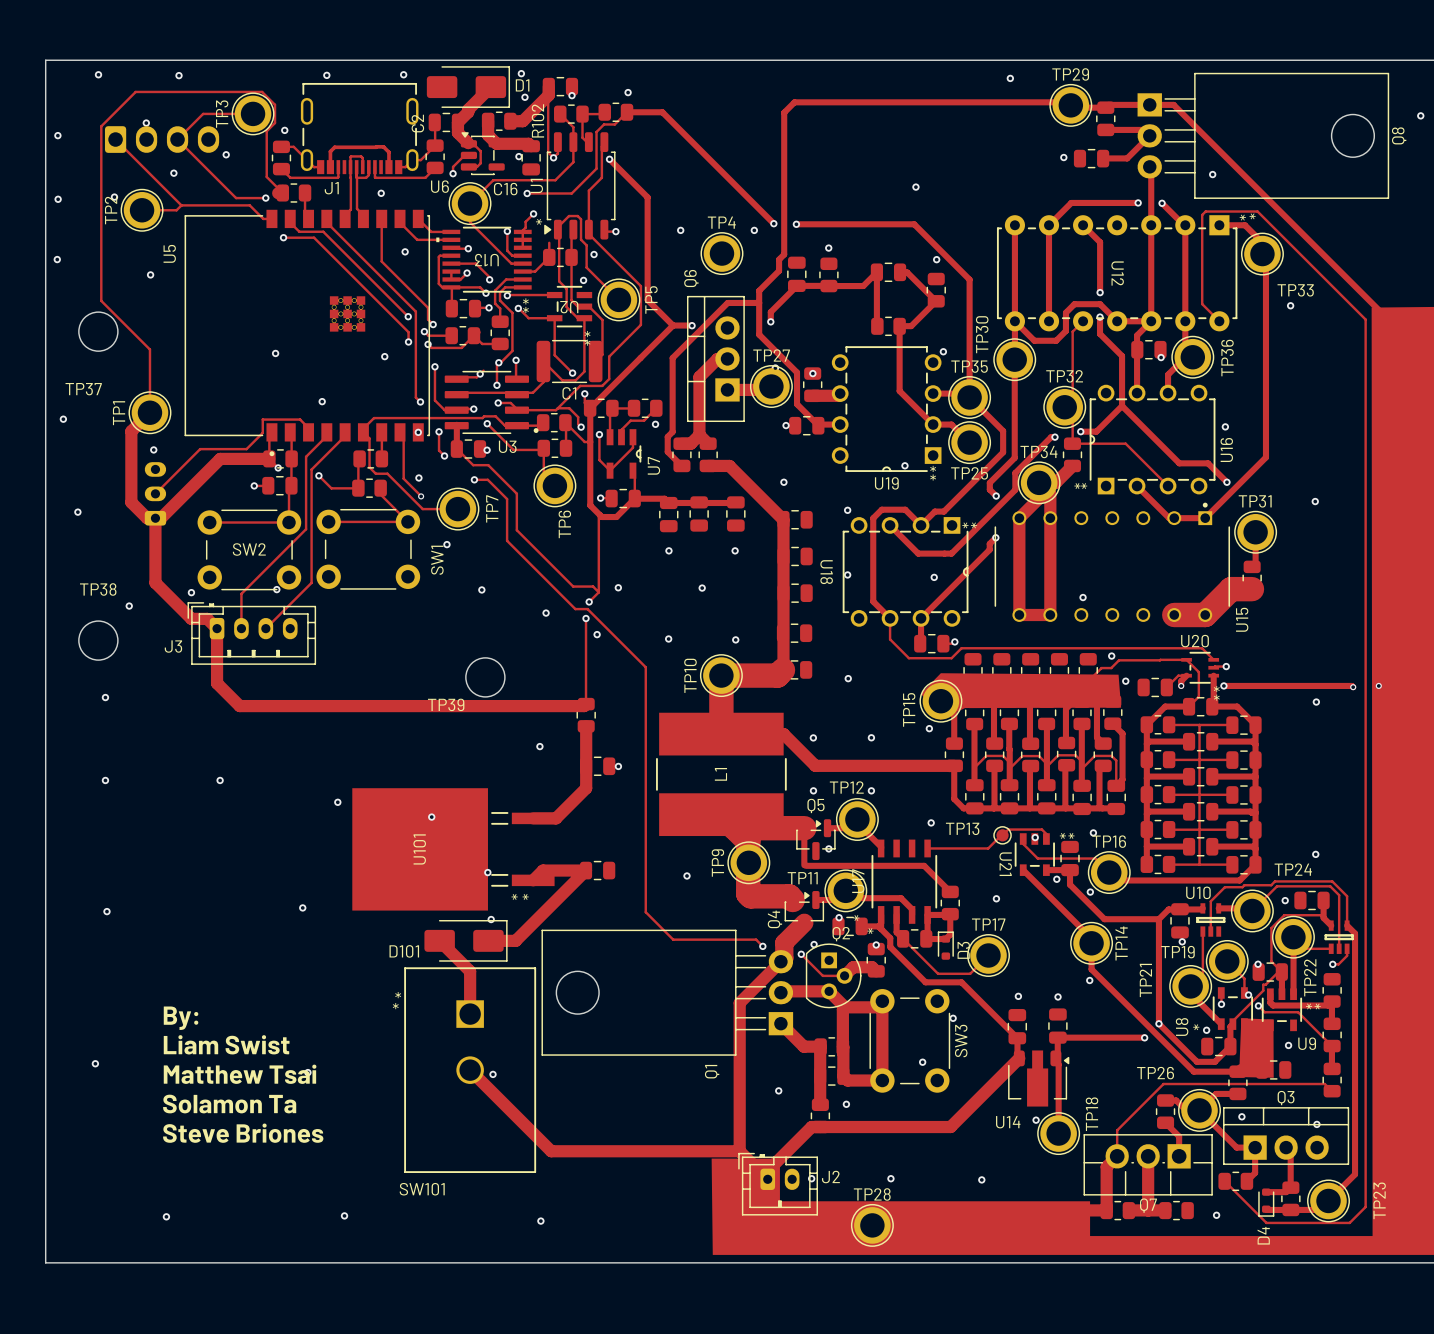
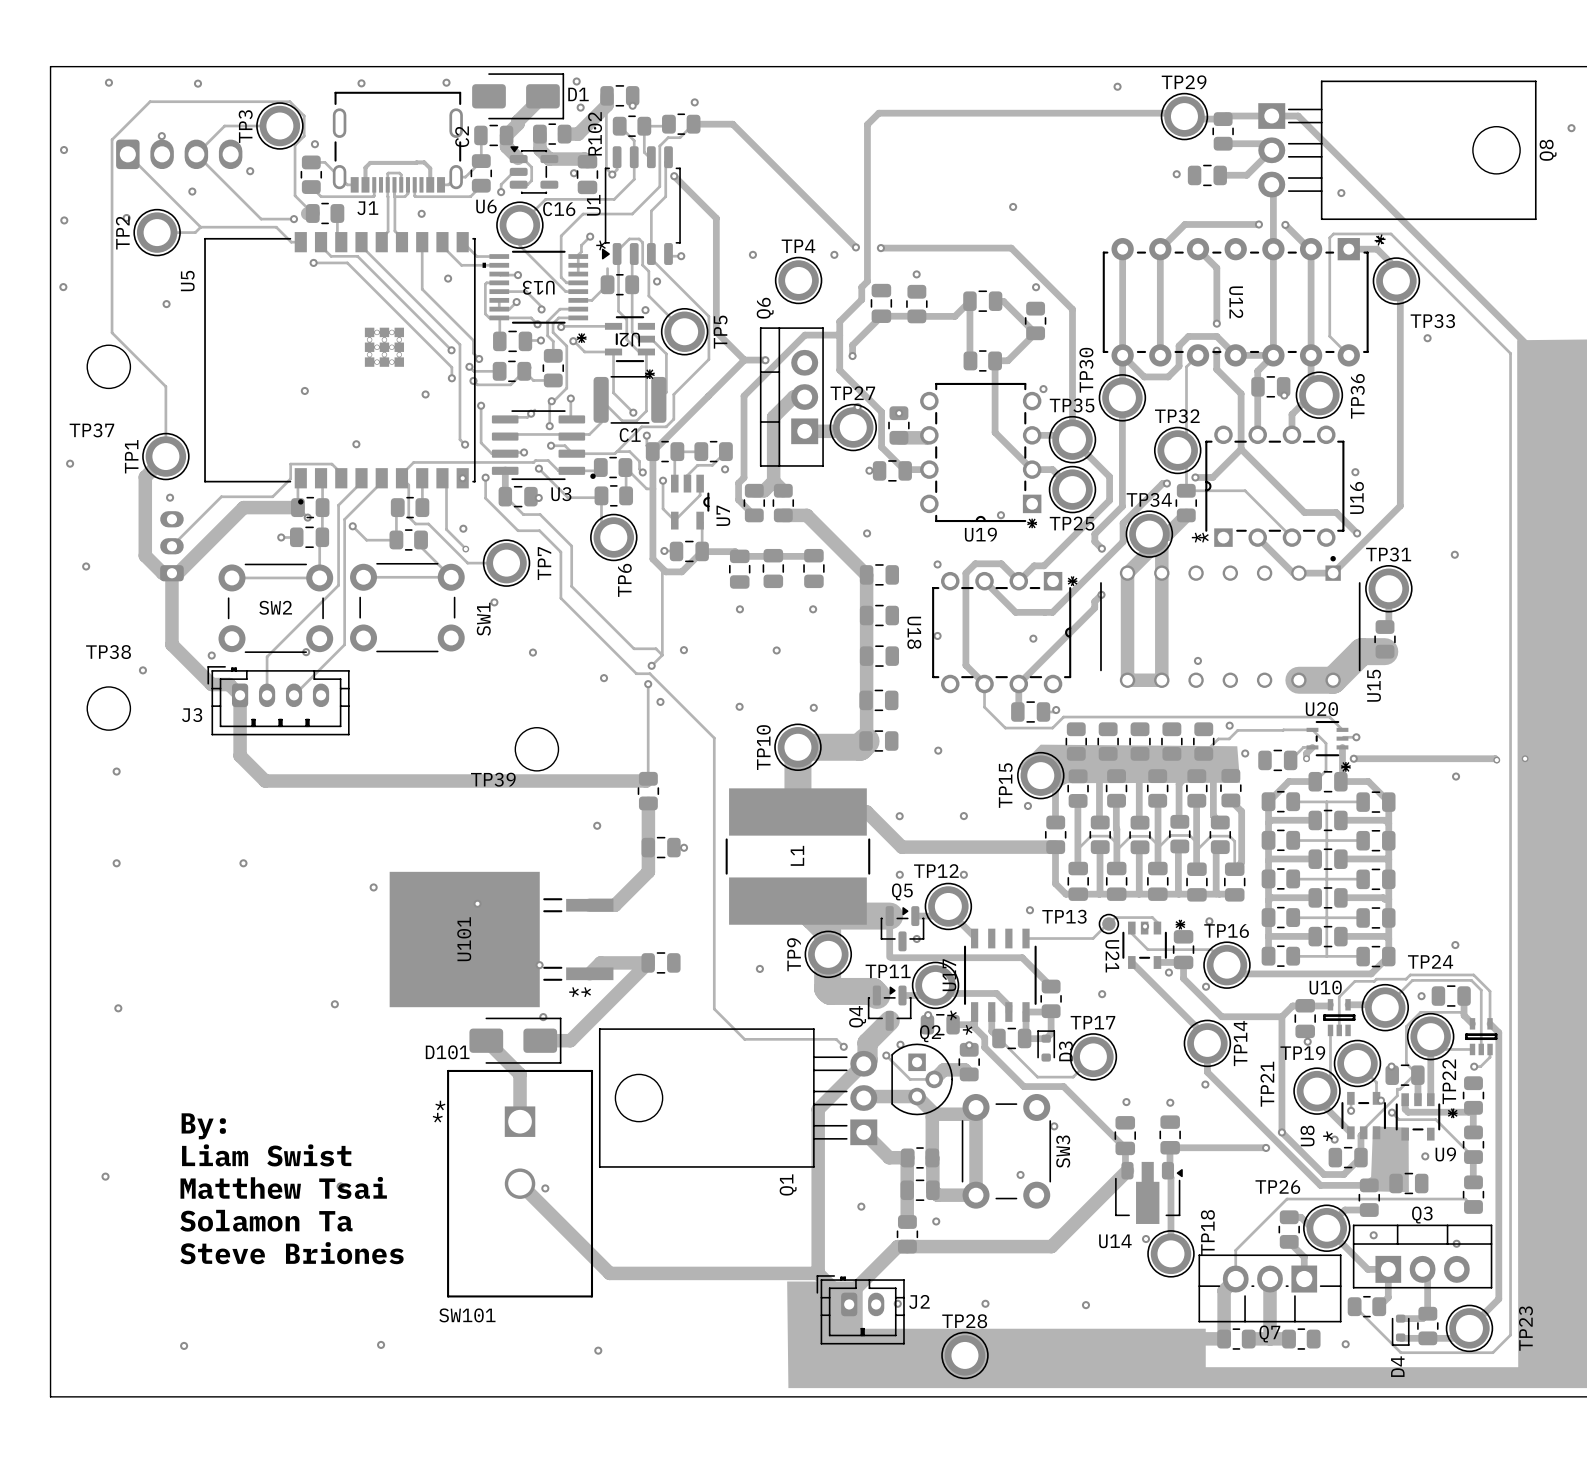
track: none -> (583, 214) (561, 235) (561, 255)
via: (527, 193) -> none
via: (507, 231) -> none
track: none -> (491, 504) (518, 530) (524, 530)
via: (444, 455) -> none
via: (474, 479) -> none

